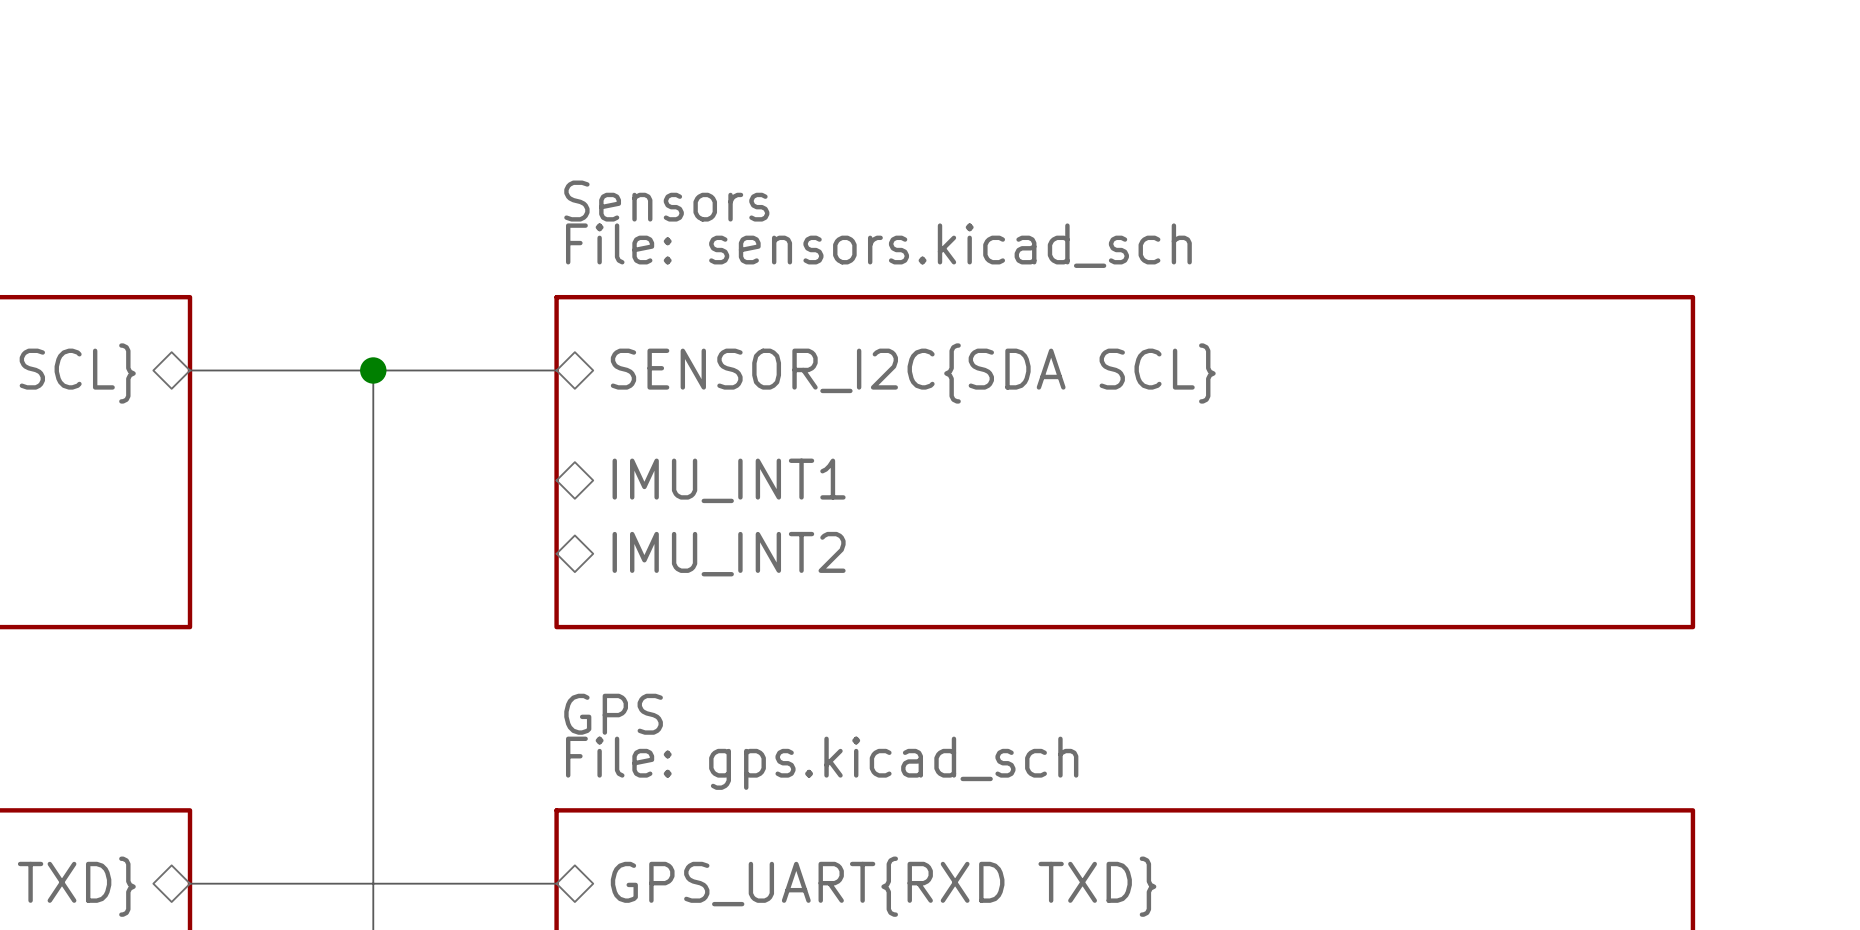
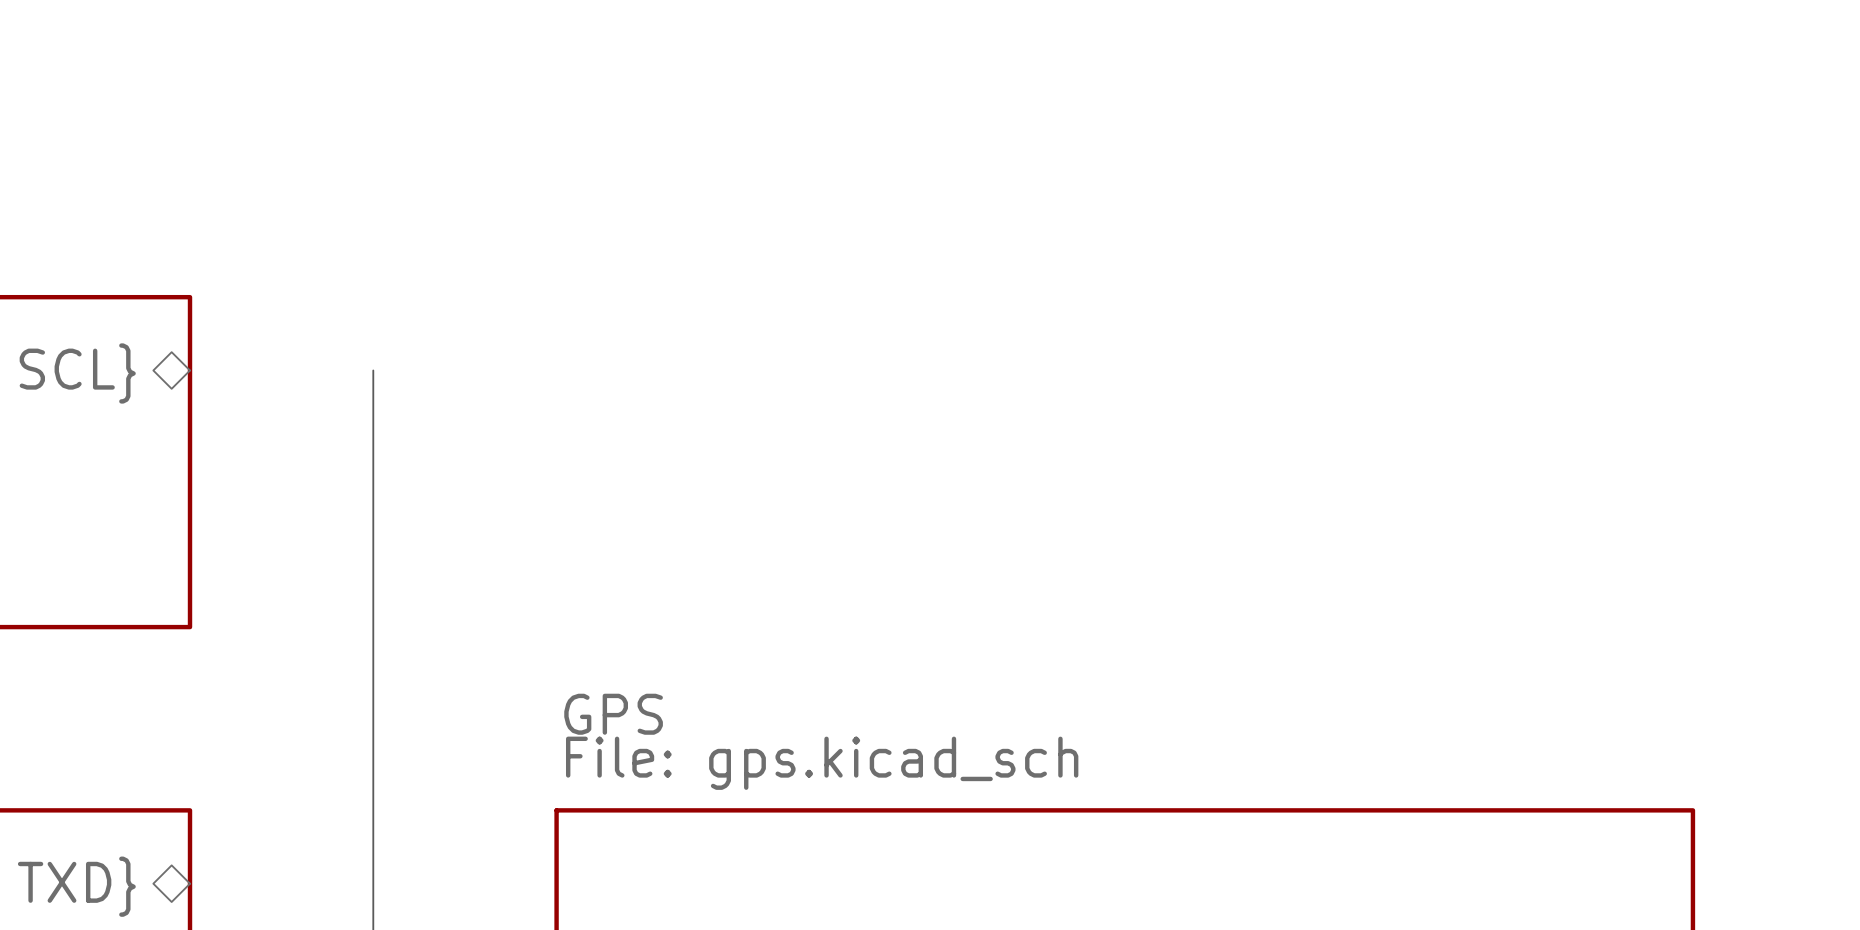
bus: (190, 370) (556, 370) -> none
junction: (373, 370) -> none
sheet pin: SENSOR_I2C{SDA SCL} (913, 373) -> none
sheet Sensors: File: sensors.kicad_sch (1124, 462) -> none
sheet pin: IMU_INT1 (729, 480) -> none
sheet pin: IMU_INT2 (729, 554) -> none
bus: (190, 883) (556, 883) -> none
sheet pin: GPS_UART{RXD TXD} (883, 886) -> none

